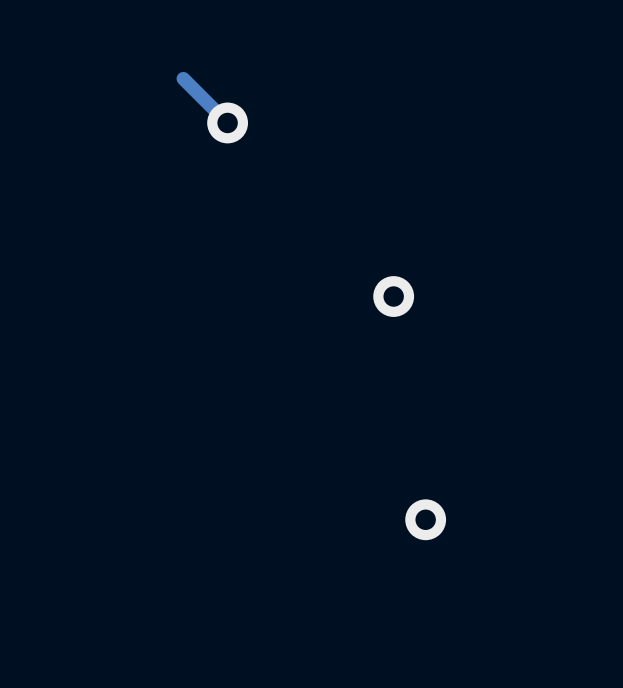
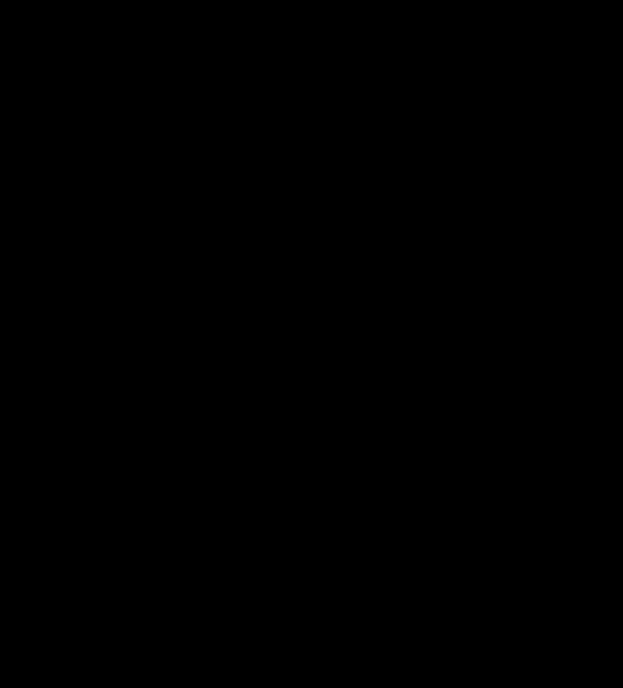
track: (183, 78) (227, 122) -> none
via: (227, 122) -> none
via: (393, 296) -> none
via: (425, 519) -> none

